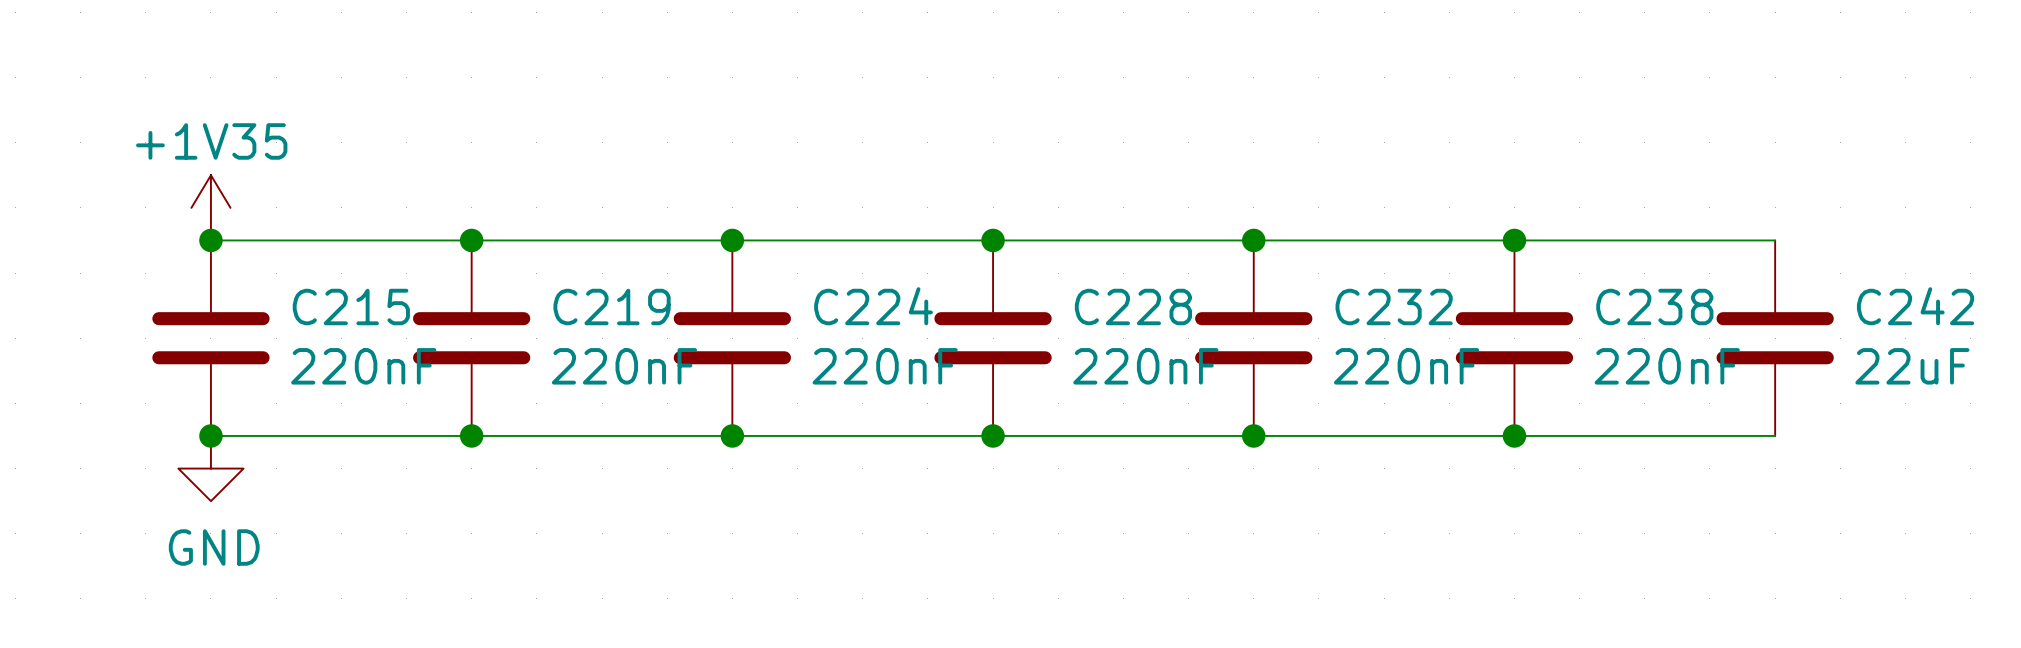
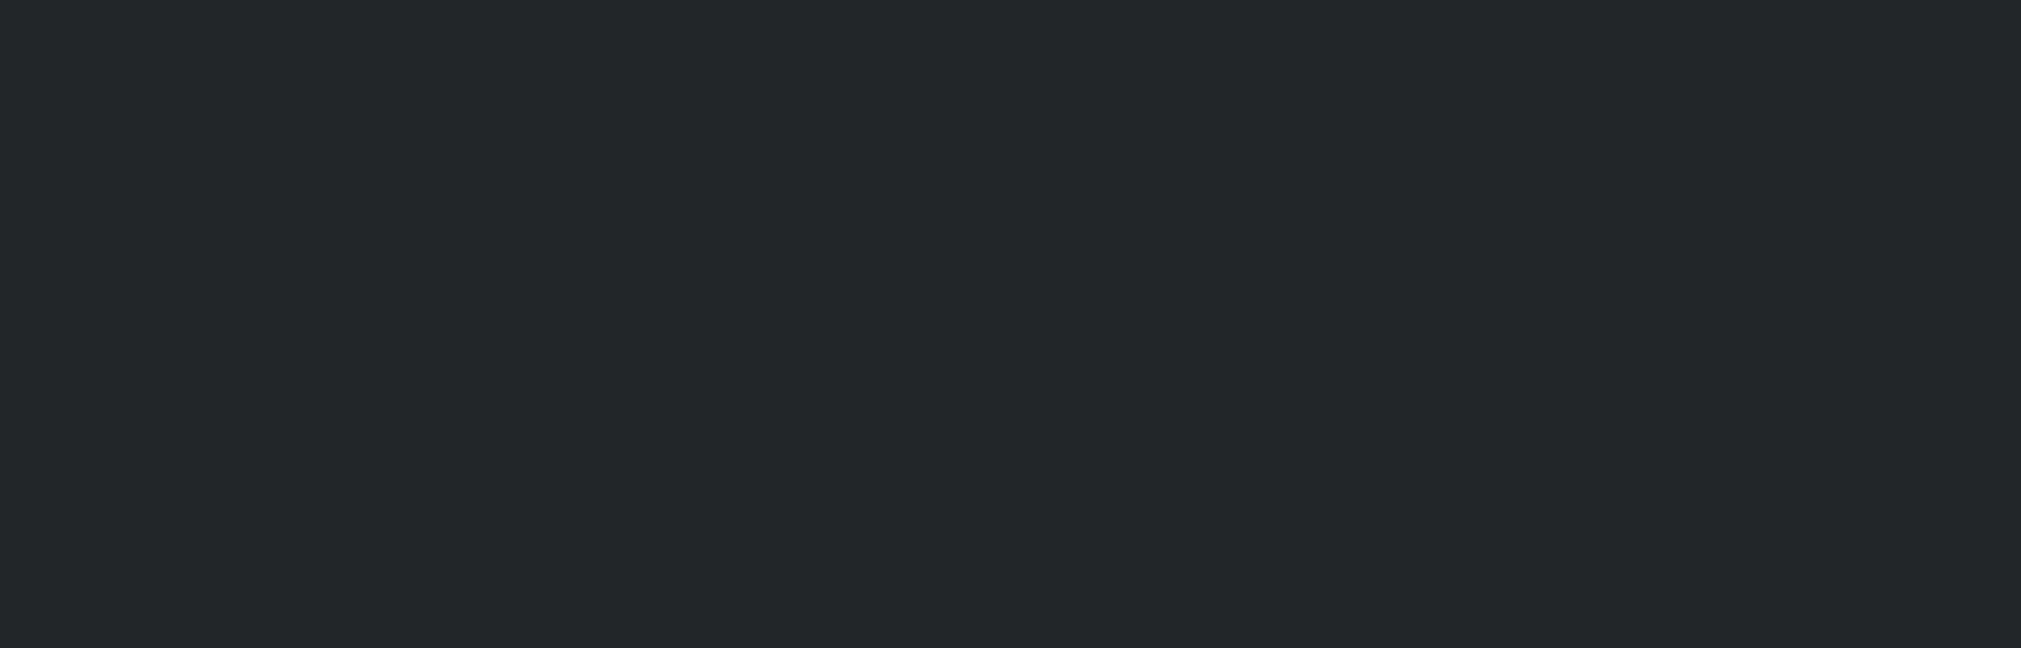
power symbol: +1V35 (210, 207) -> none
wire: (210, 240) (1775, 240) -> none
junction: (210, 240) -> none
junction: (471, 240) -> none
junction: (732, 240) -> none
junction: (993, 240) -> none
junction: (1253, 240) -> none
junction: (1514, 240) -> none
C215: 220nF (210, 338) -> none
C219: 220nF (471, 338) -> none
C224: 220nF (732, 338) -> none
C228: 220nF (993, 338) -> none
C232: 220nF (1253, 338) -> none
C238: 220nF (1514, 338) -> none
C242: 22uF (1775, 338) -> none
wire: (210, 435) (1775, 435) -> none
junction: (210, 435) -> none
junction: (471, 435) -> none
junction: (732, 435) -> none
junction: (993, 435) -> none
junction: (1253, 435) -> none
junction: (1514, 435) -> none
power symbol: GND (210, 468) -> none

